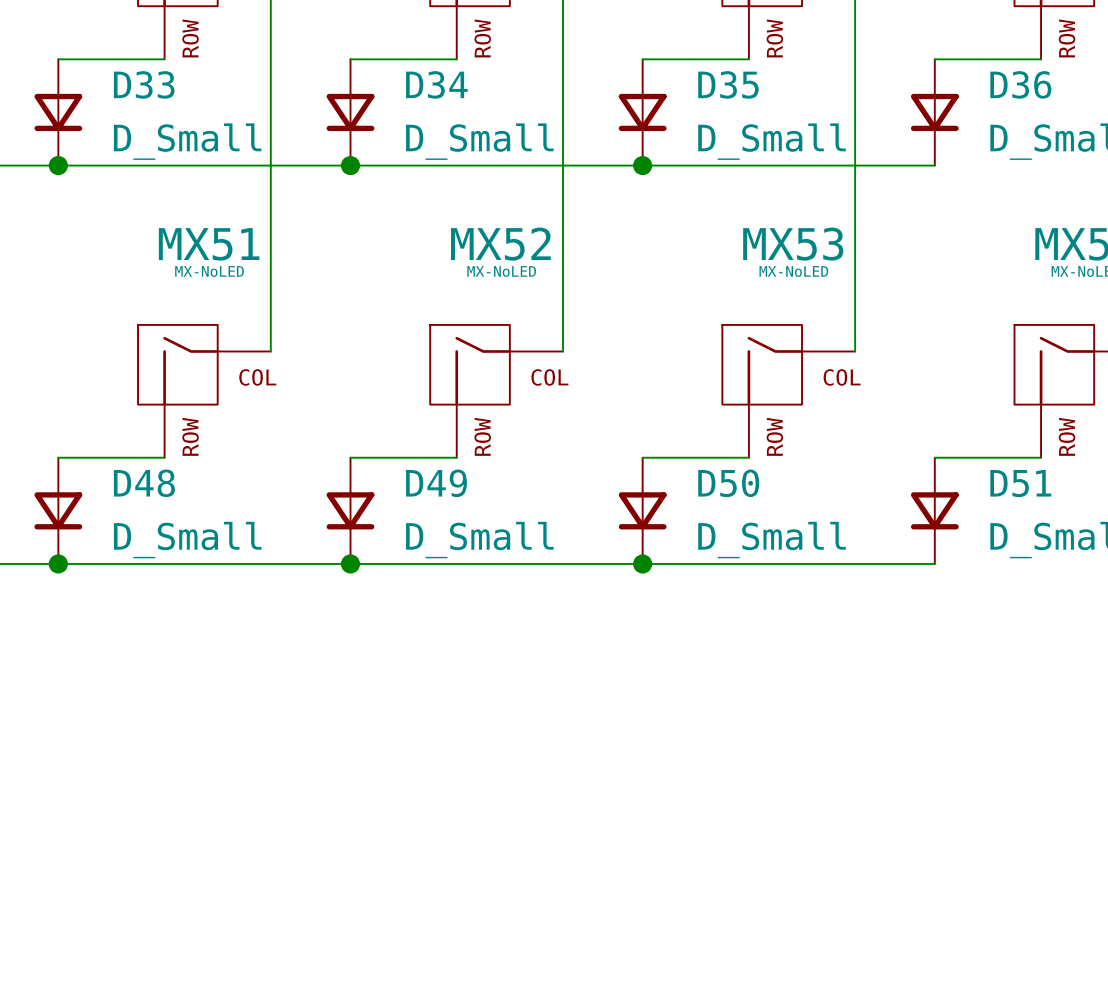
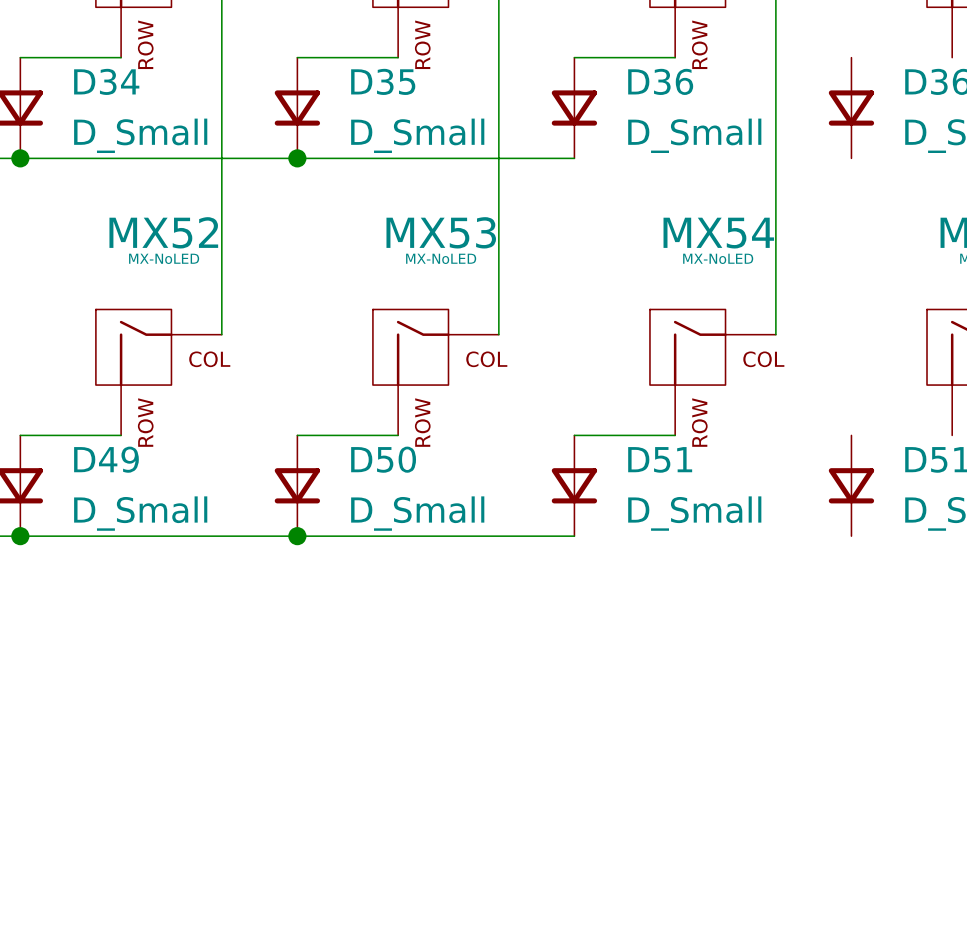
wire: (934, 59) (1041, 59) -> none
D33 name: D33 (144, 84) -> D34 (106, 81)
D34 name: D34 (436, 84) -> D35 (383, 81)
D35 name: D35 (728, 84) -> D36 (660, 81)
wire: (642, 165) (934, 165) -> none
junction: (642, 165) -> none
MX51 name: MX51 (209, 244) -> MX52 (163, 232)
MX52 name: MX52 (500, 244) -> MX53 (441, 232)
MX53 name: MX53 (793, 244) -> MX54 (718, 233)
wire: (934, 457) (1041, 457) -> none
D48 name: D48 (144, 483) -> D49 (106, 459)
D49 name: D49 (436, 483) -> D50 (383, 459)
D50 name: D50 (728, 483) -> D51 (660, 459)
wire: (642, 563) (934, 563) -> none
junction: (642, 563) -> none

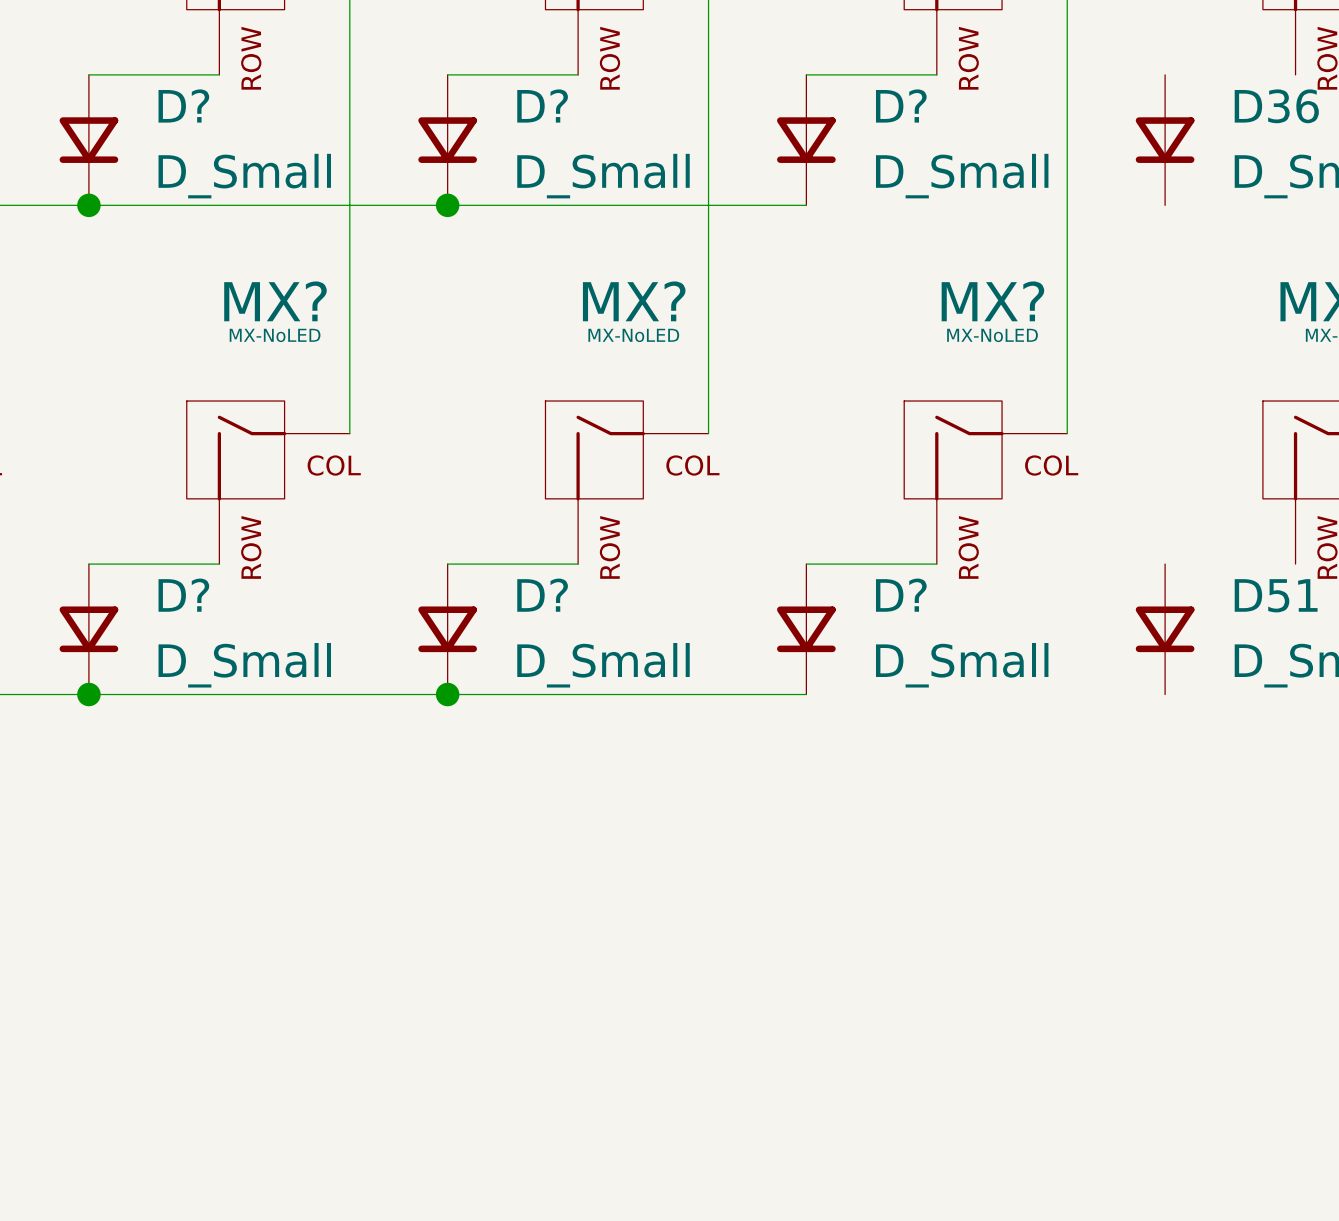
D34 name: D34 (106, 81) -> D? (183, 105)
D35 name: D35 (383, 81) -> D? (542, 105)
D36 name: D36 (660, 81) -> D? (901, 105)
MX52 name: MX52 (163, 232) -> MX? (275, 301)
MX53 name: MX53 (441, 232) -> MX? (634, 301)
MX54 name: MX54 (718, 233) -> MX? (992, 301)
D49 name: D49 (106, 459) -> D? (183, 595)
D50 name: D50 (383, 459) -> D? (542, 595)
D51 name: D51 (660, 459) -> D? (901, 595)

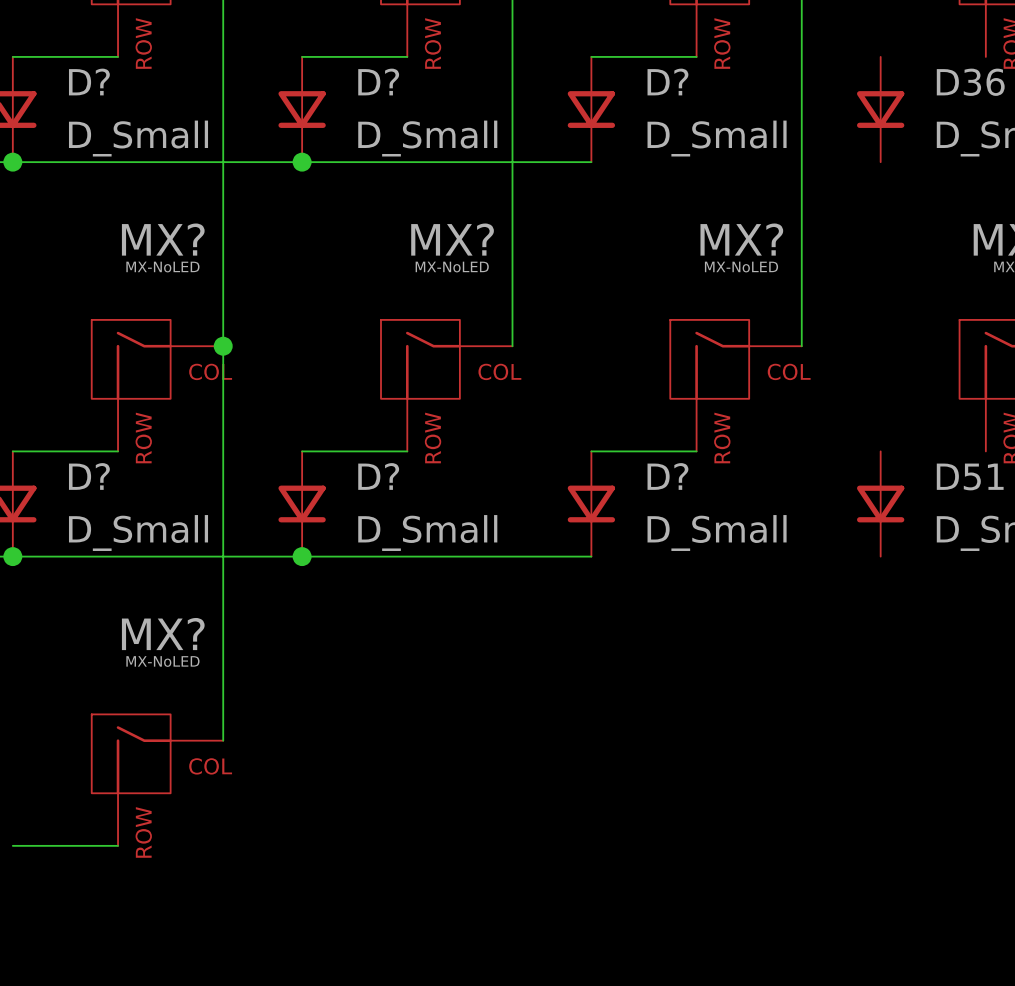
wire: none -> (223, 346) (223, 740)
junction: none -> (223, 346)
MX?: none -> MX-NoLED (157, 780)
wire: none -> (12, 845) (118, 845)

